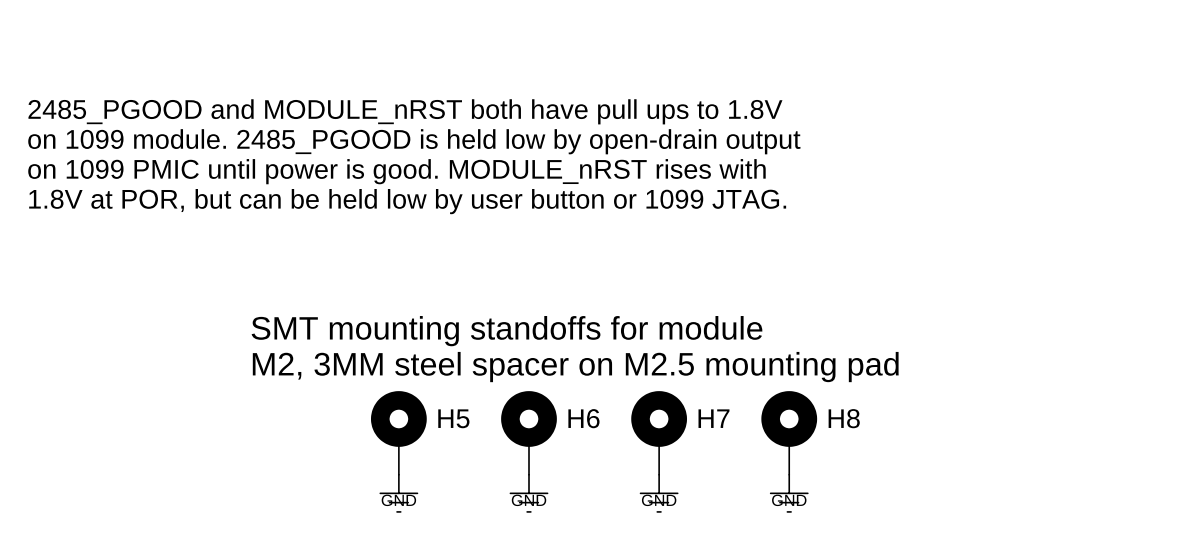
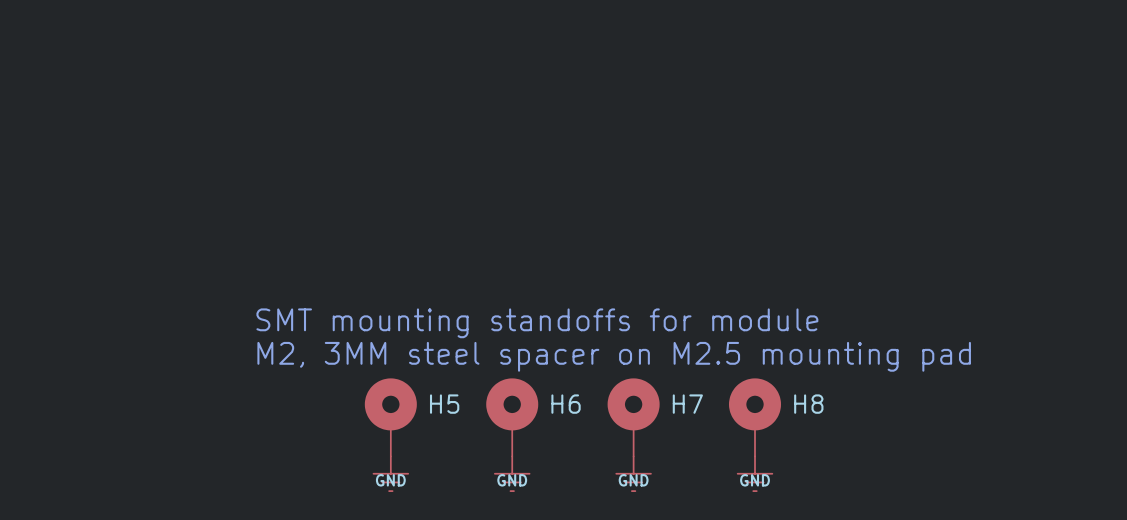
text: 2485_PGOOD and MODULE_nRST both have pull ups to 1.8V (405, 111) -> none
text: on 1099 module. 2485_PGOOD is held low by open-drain output (414, 141) -> none
text: on 1099 PMIC until power is good. MODULE_nRST rises with (396, 171) -> none
text: 1.8V at POR, but can be held low by user button or 1099 JTAG. (407, 201) -> none

